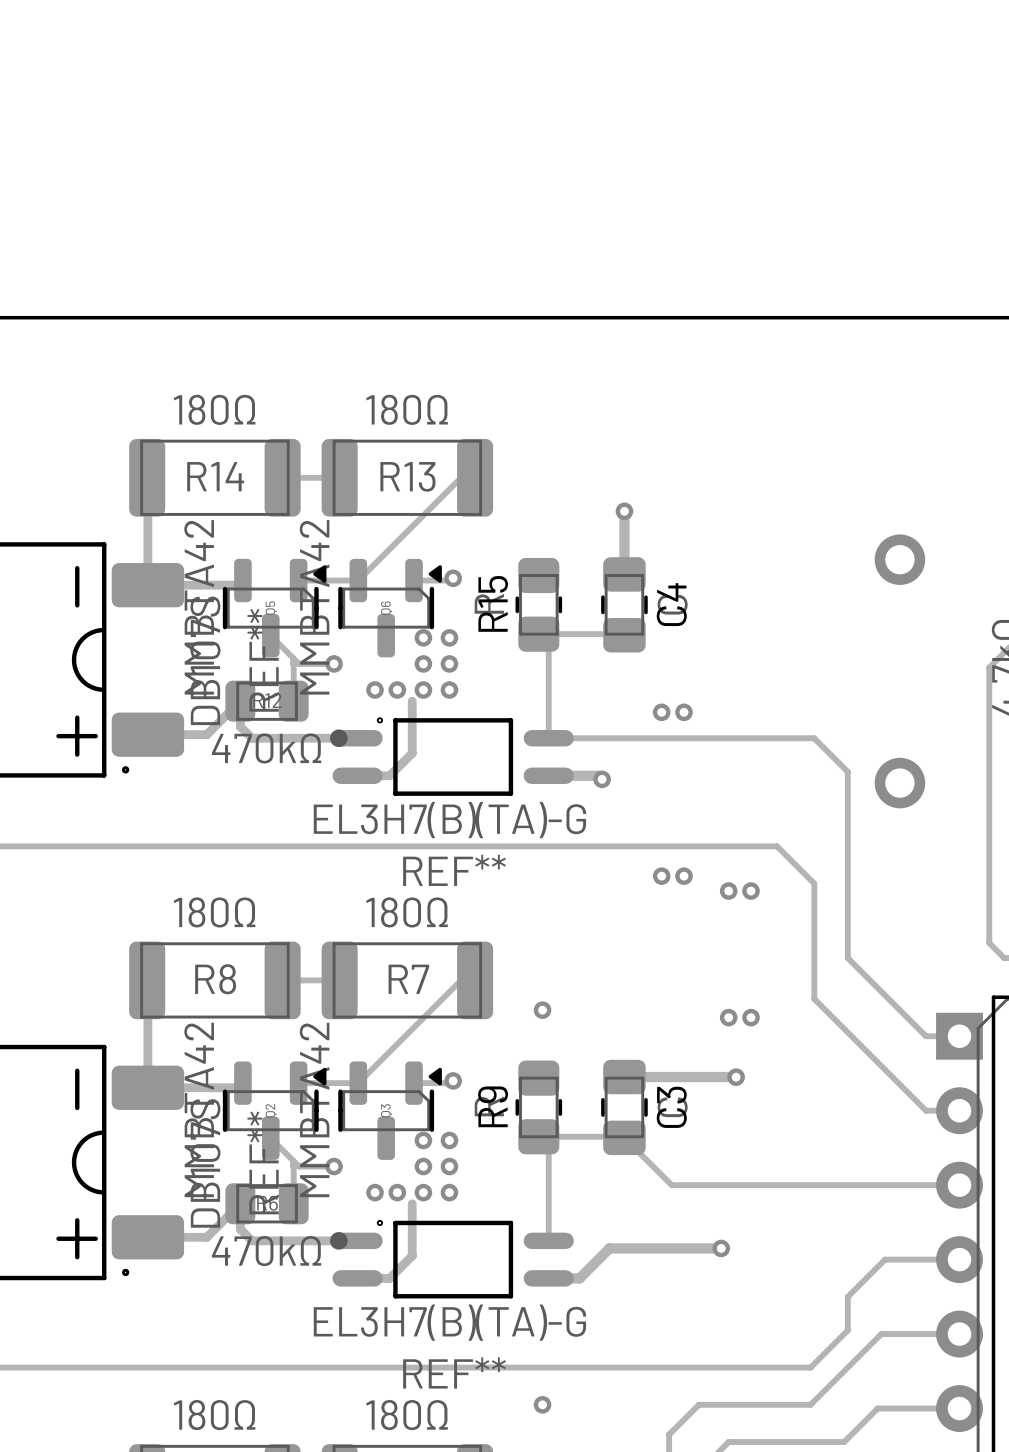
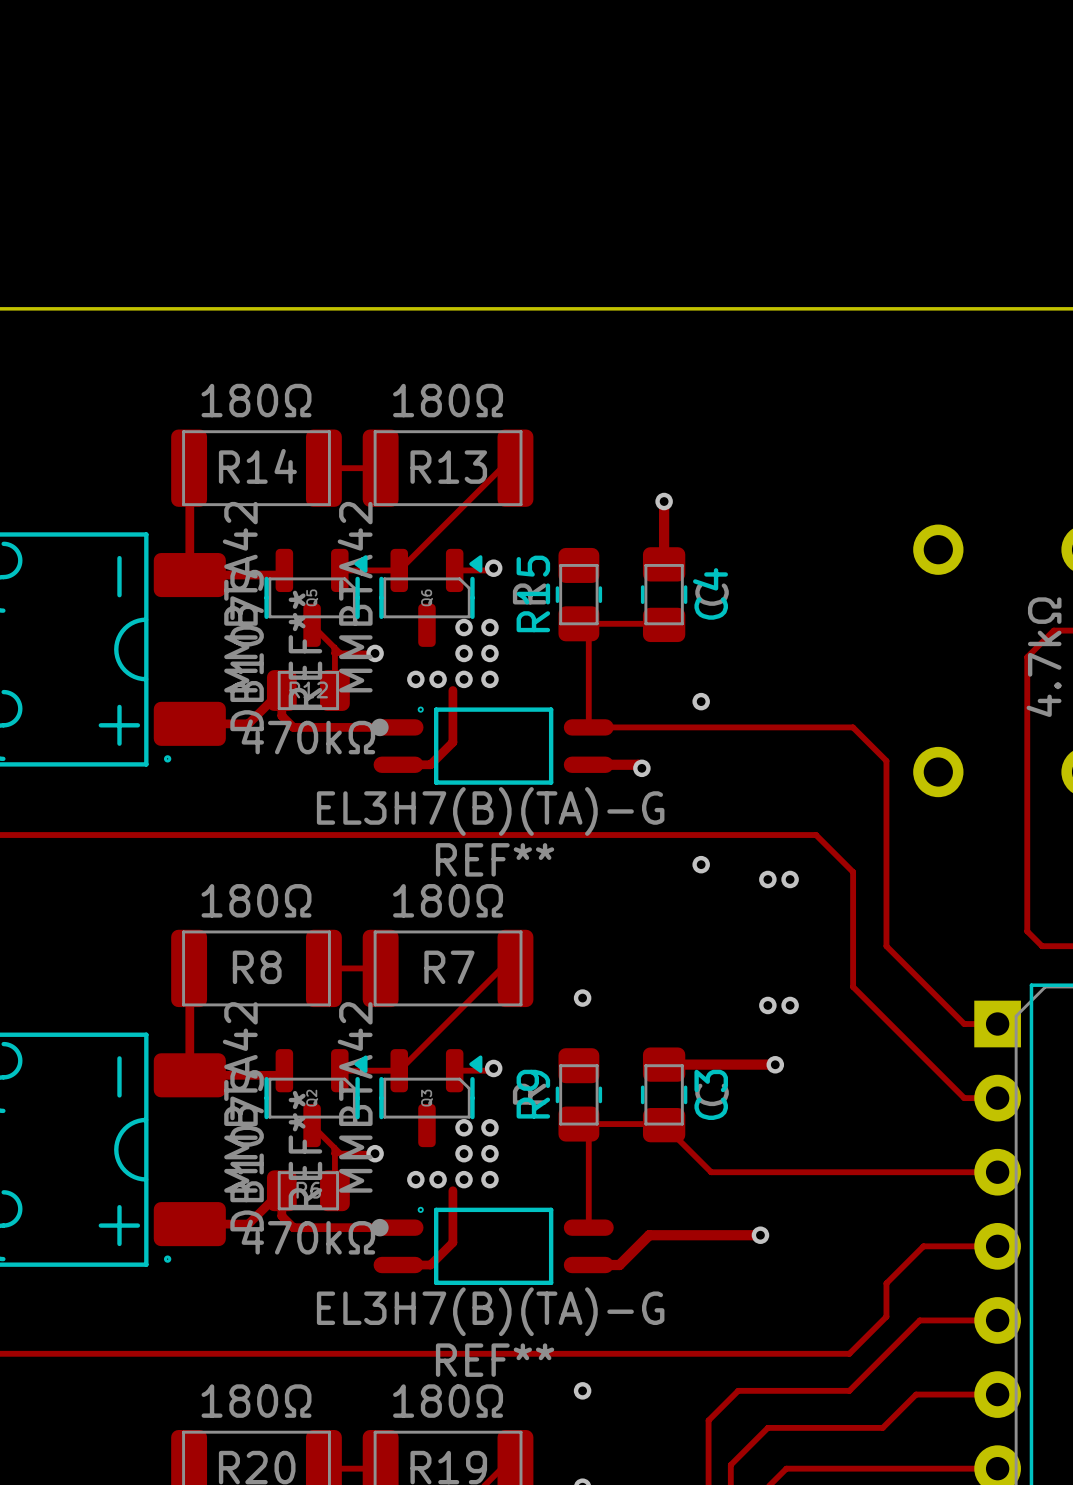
via: (684, 712) -> none
via: (684, 876) -> none

